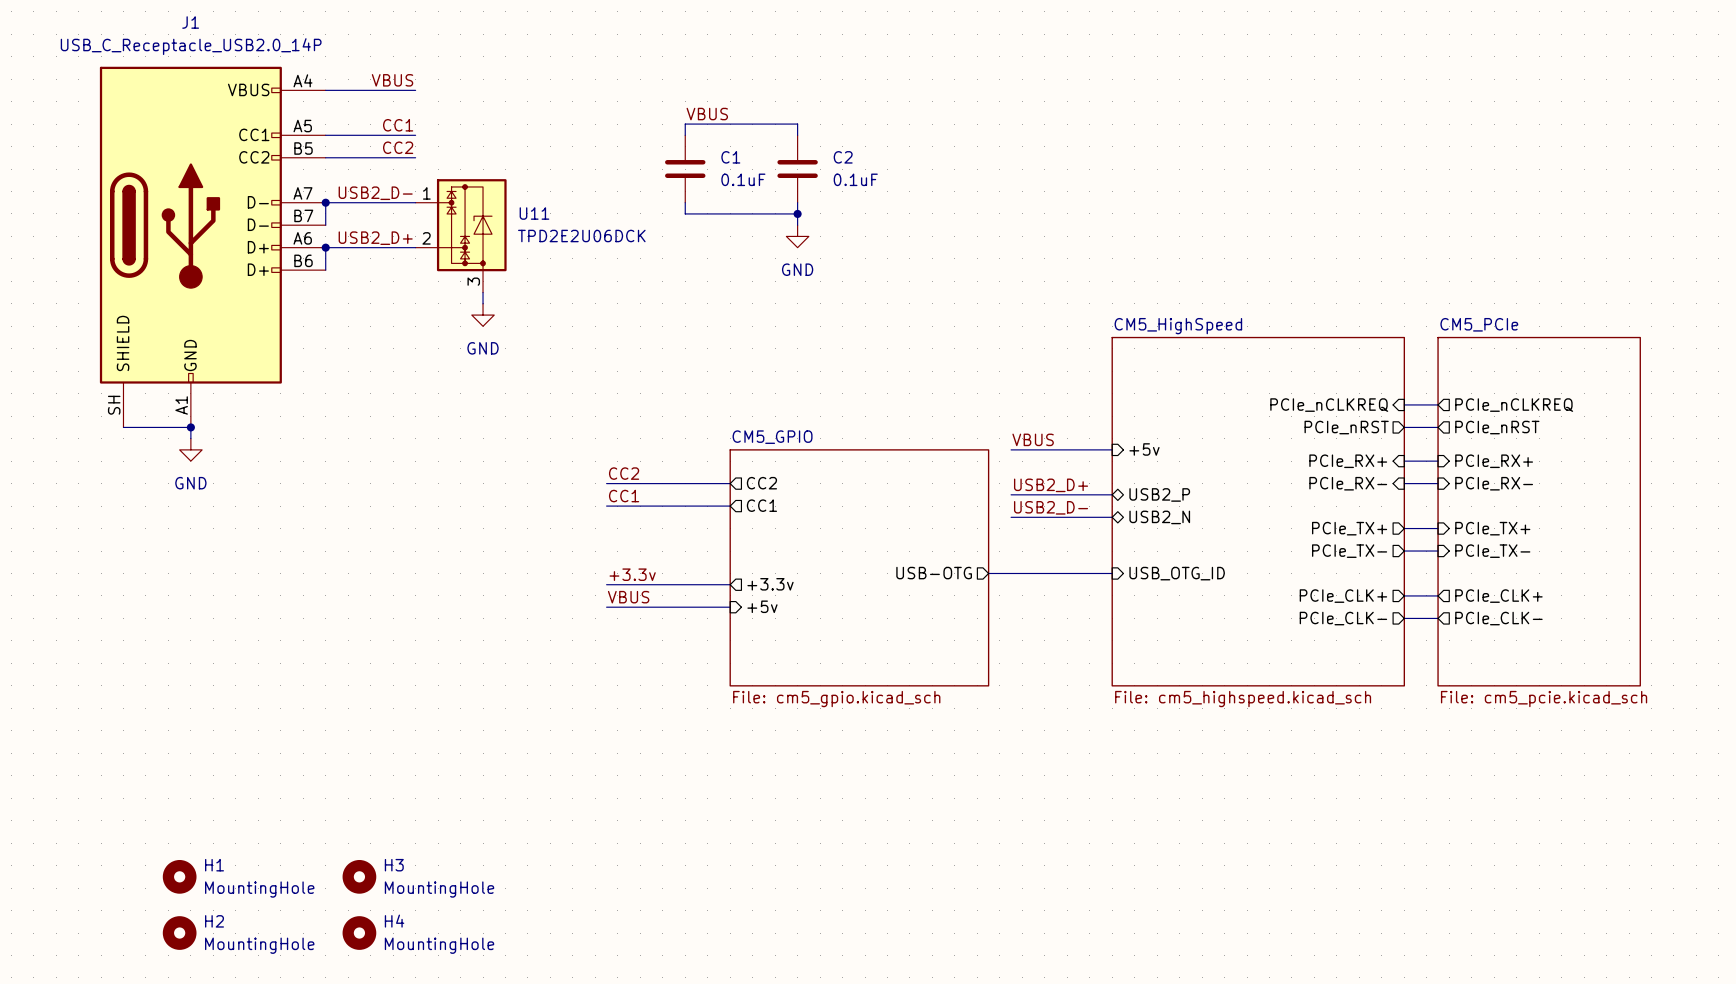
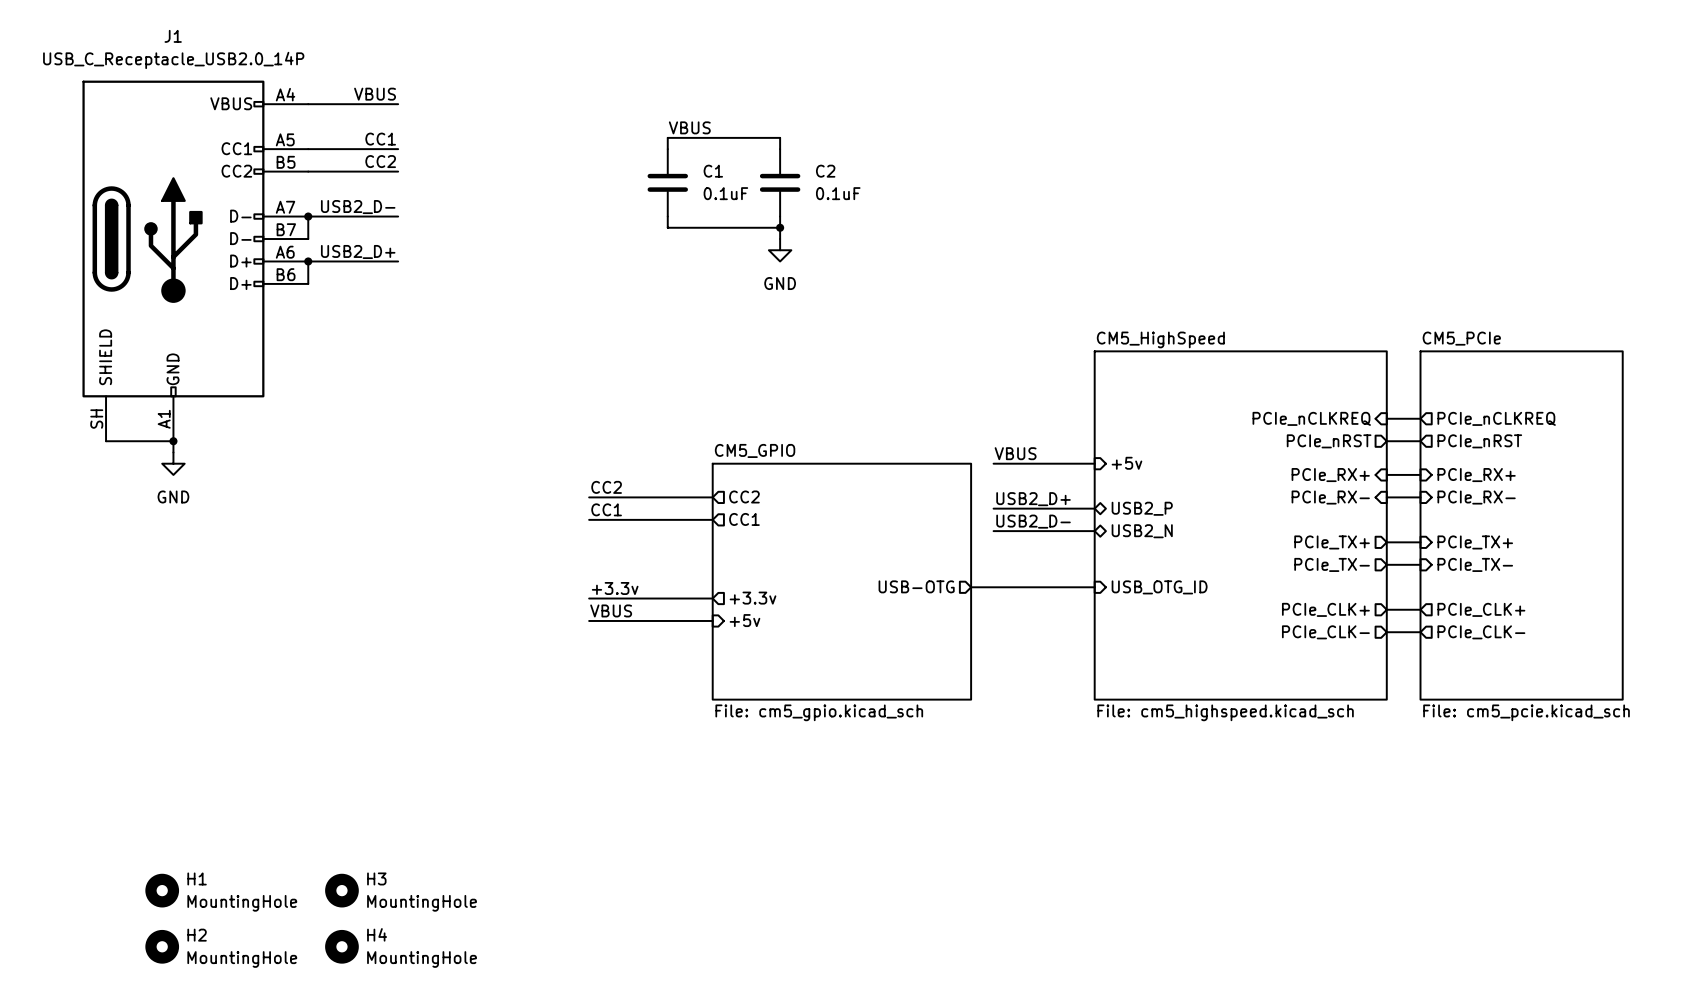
U11: TPD2E2U06DCK (461, 235) -> none
wire: (483, 292) (483, 303) -> none
power symbol: GND (483, 315) -> none

